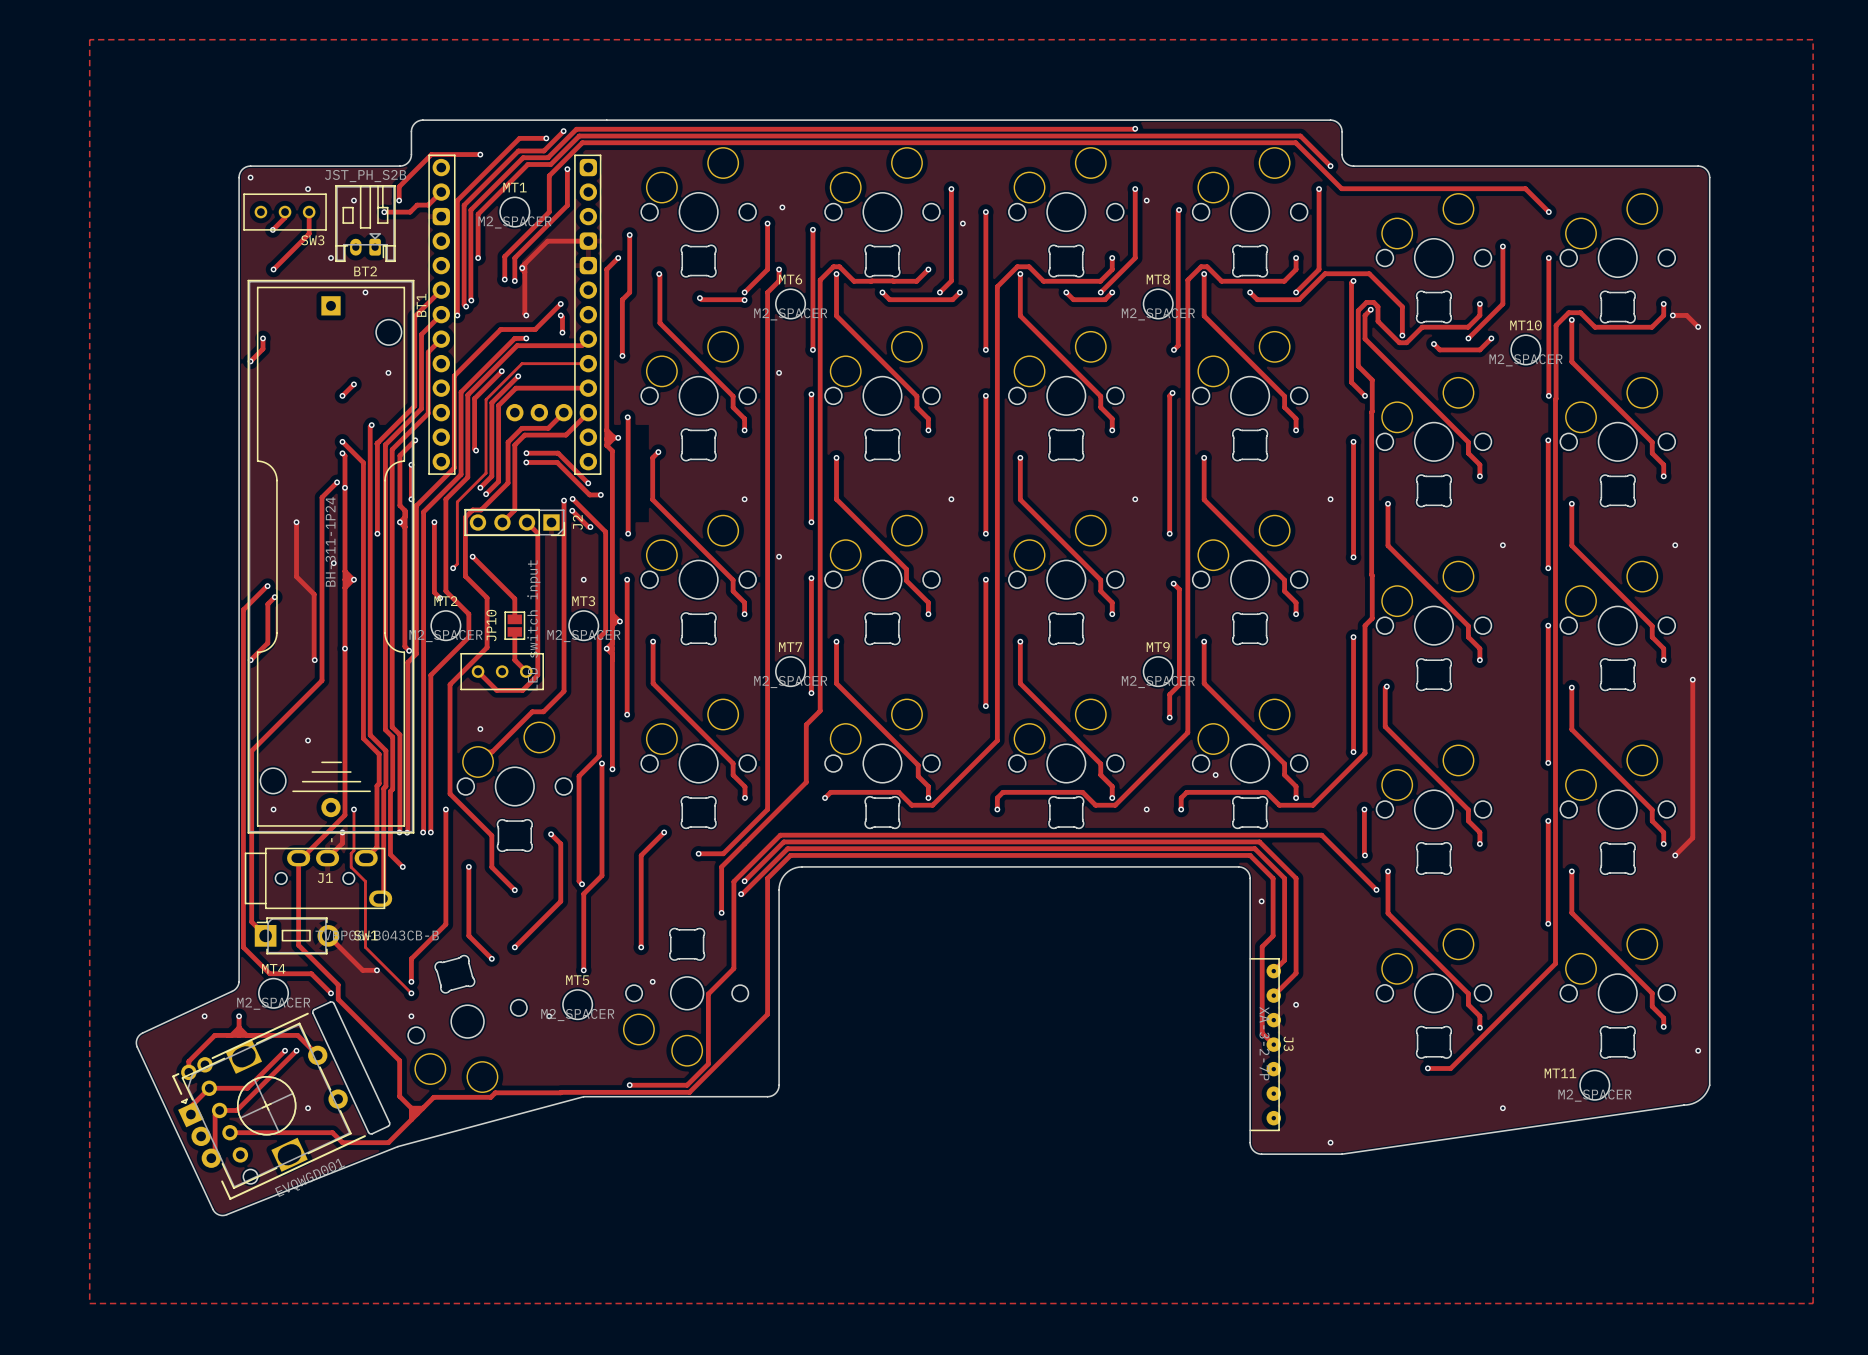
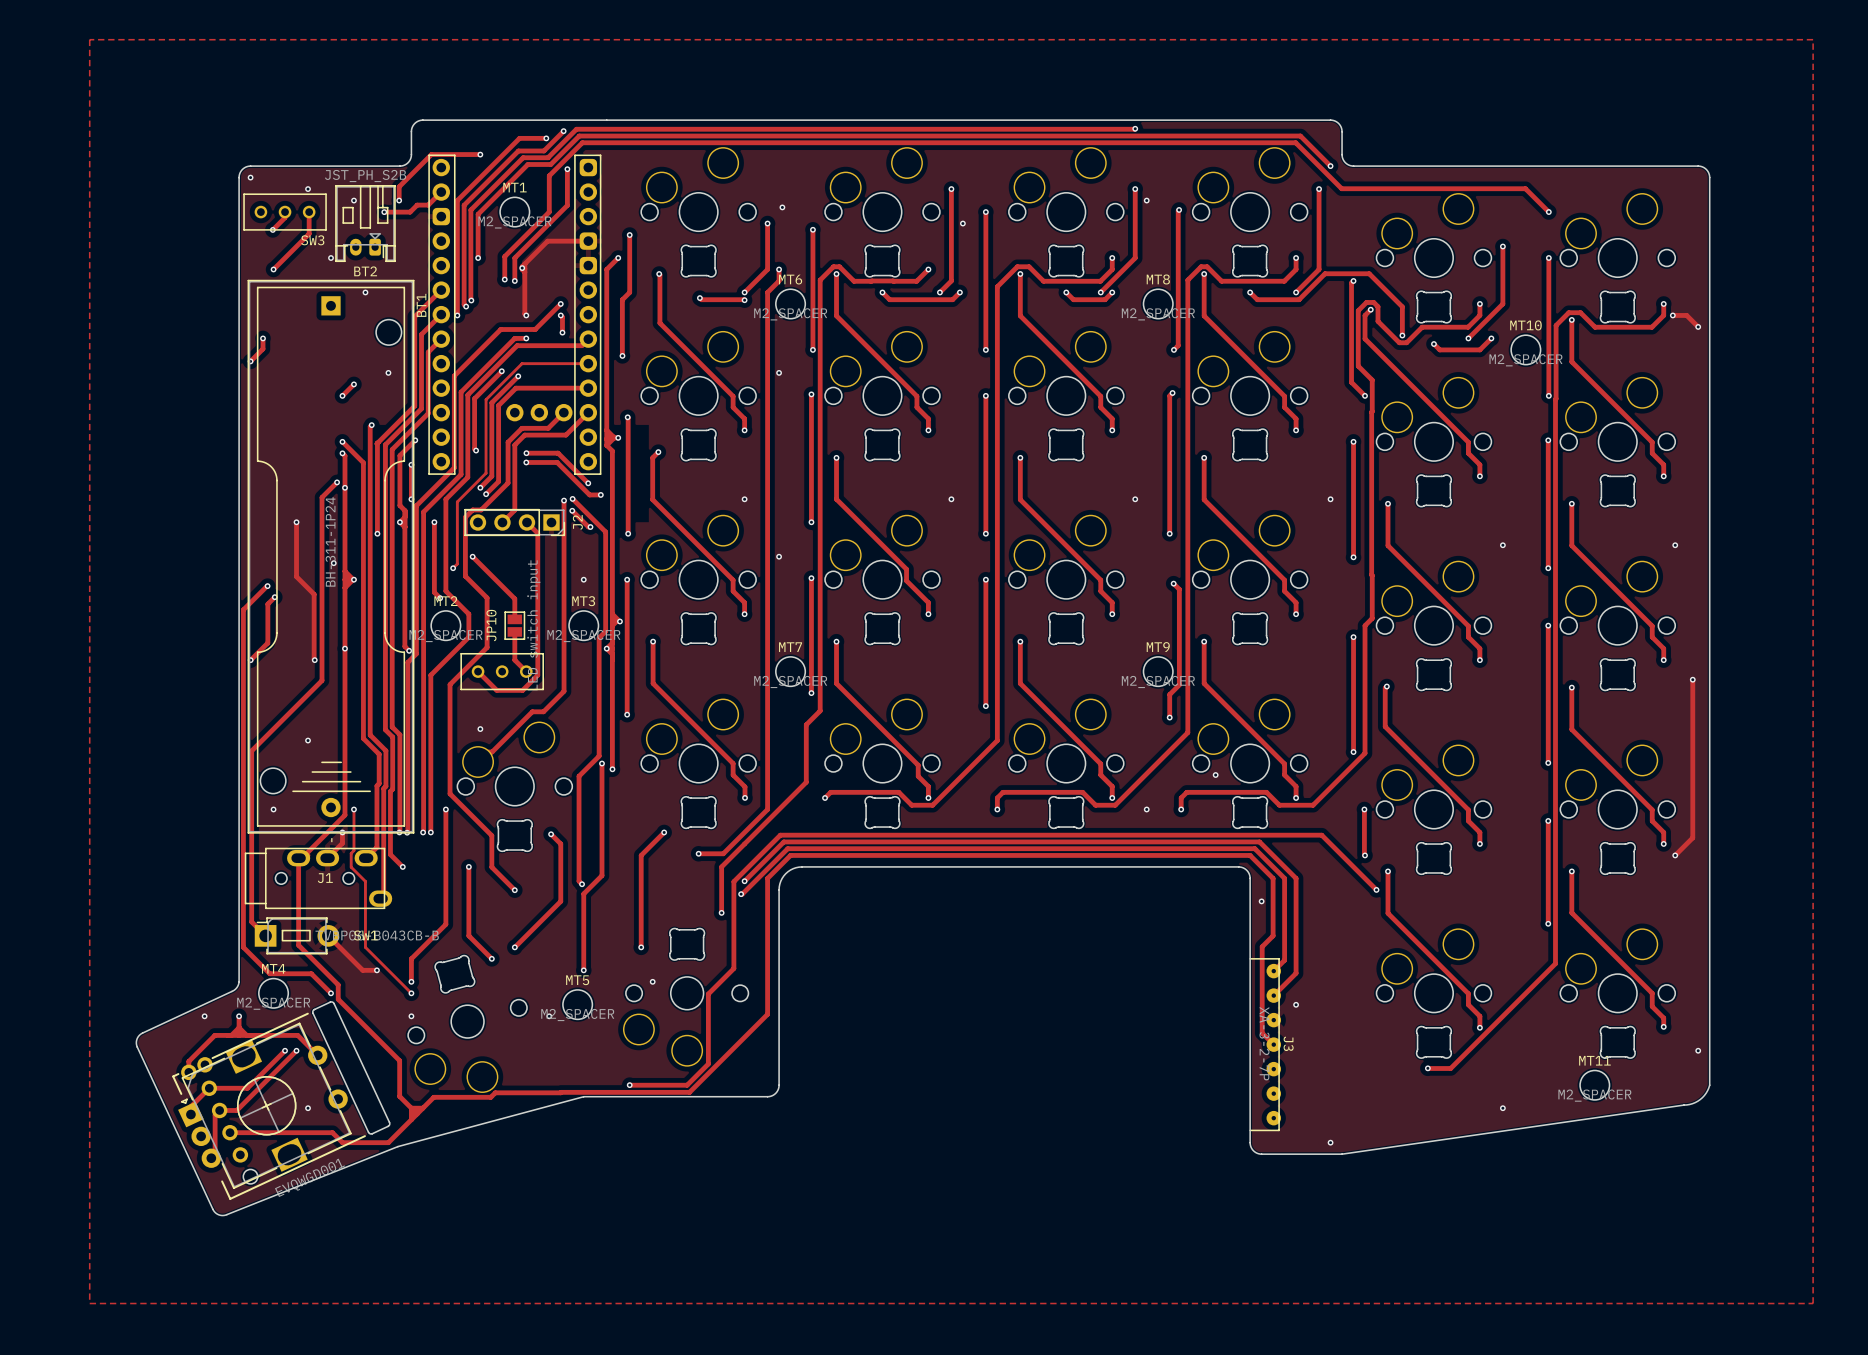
MT11 name position: MT11 (1560, 1073) -> MT11 (1594, 1060)

